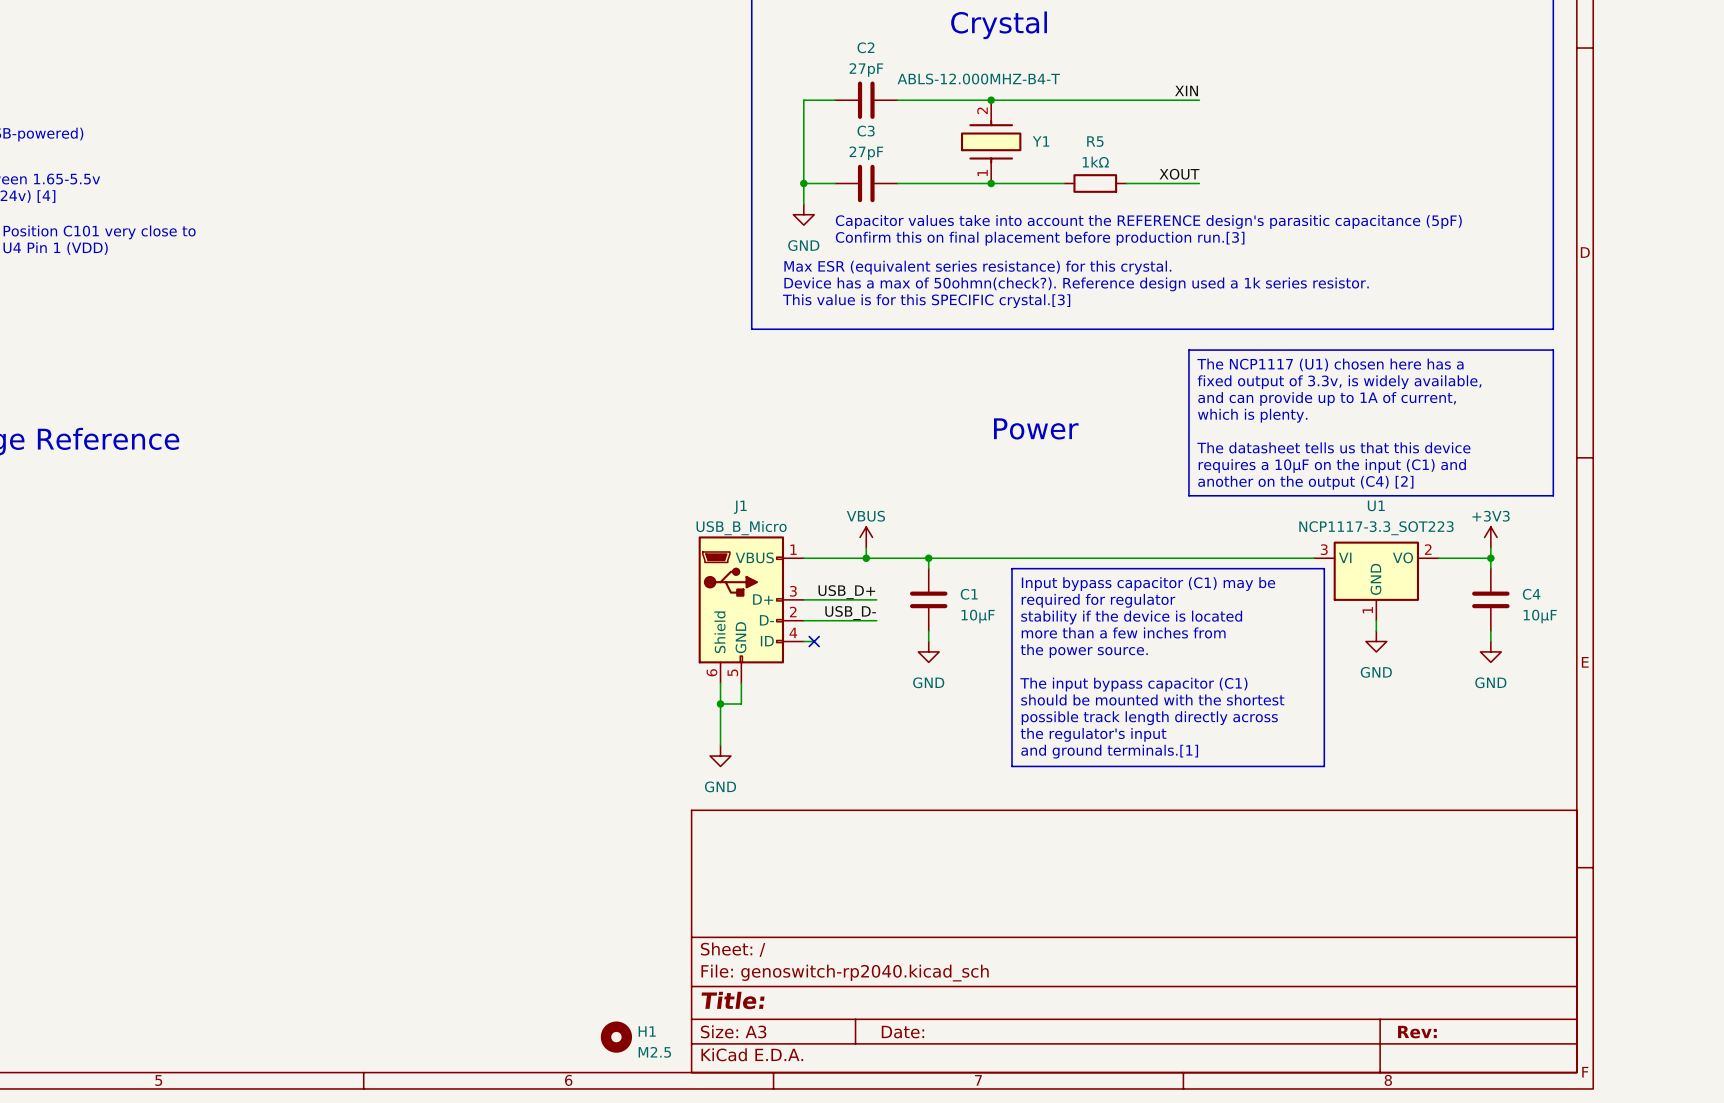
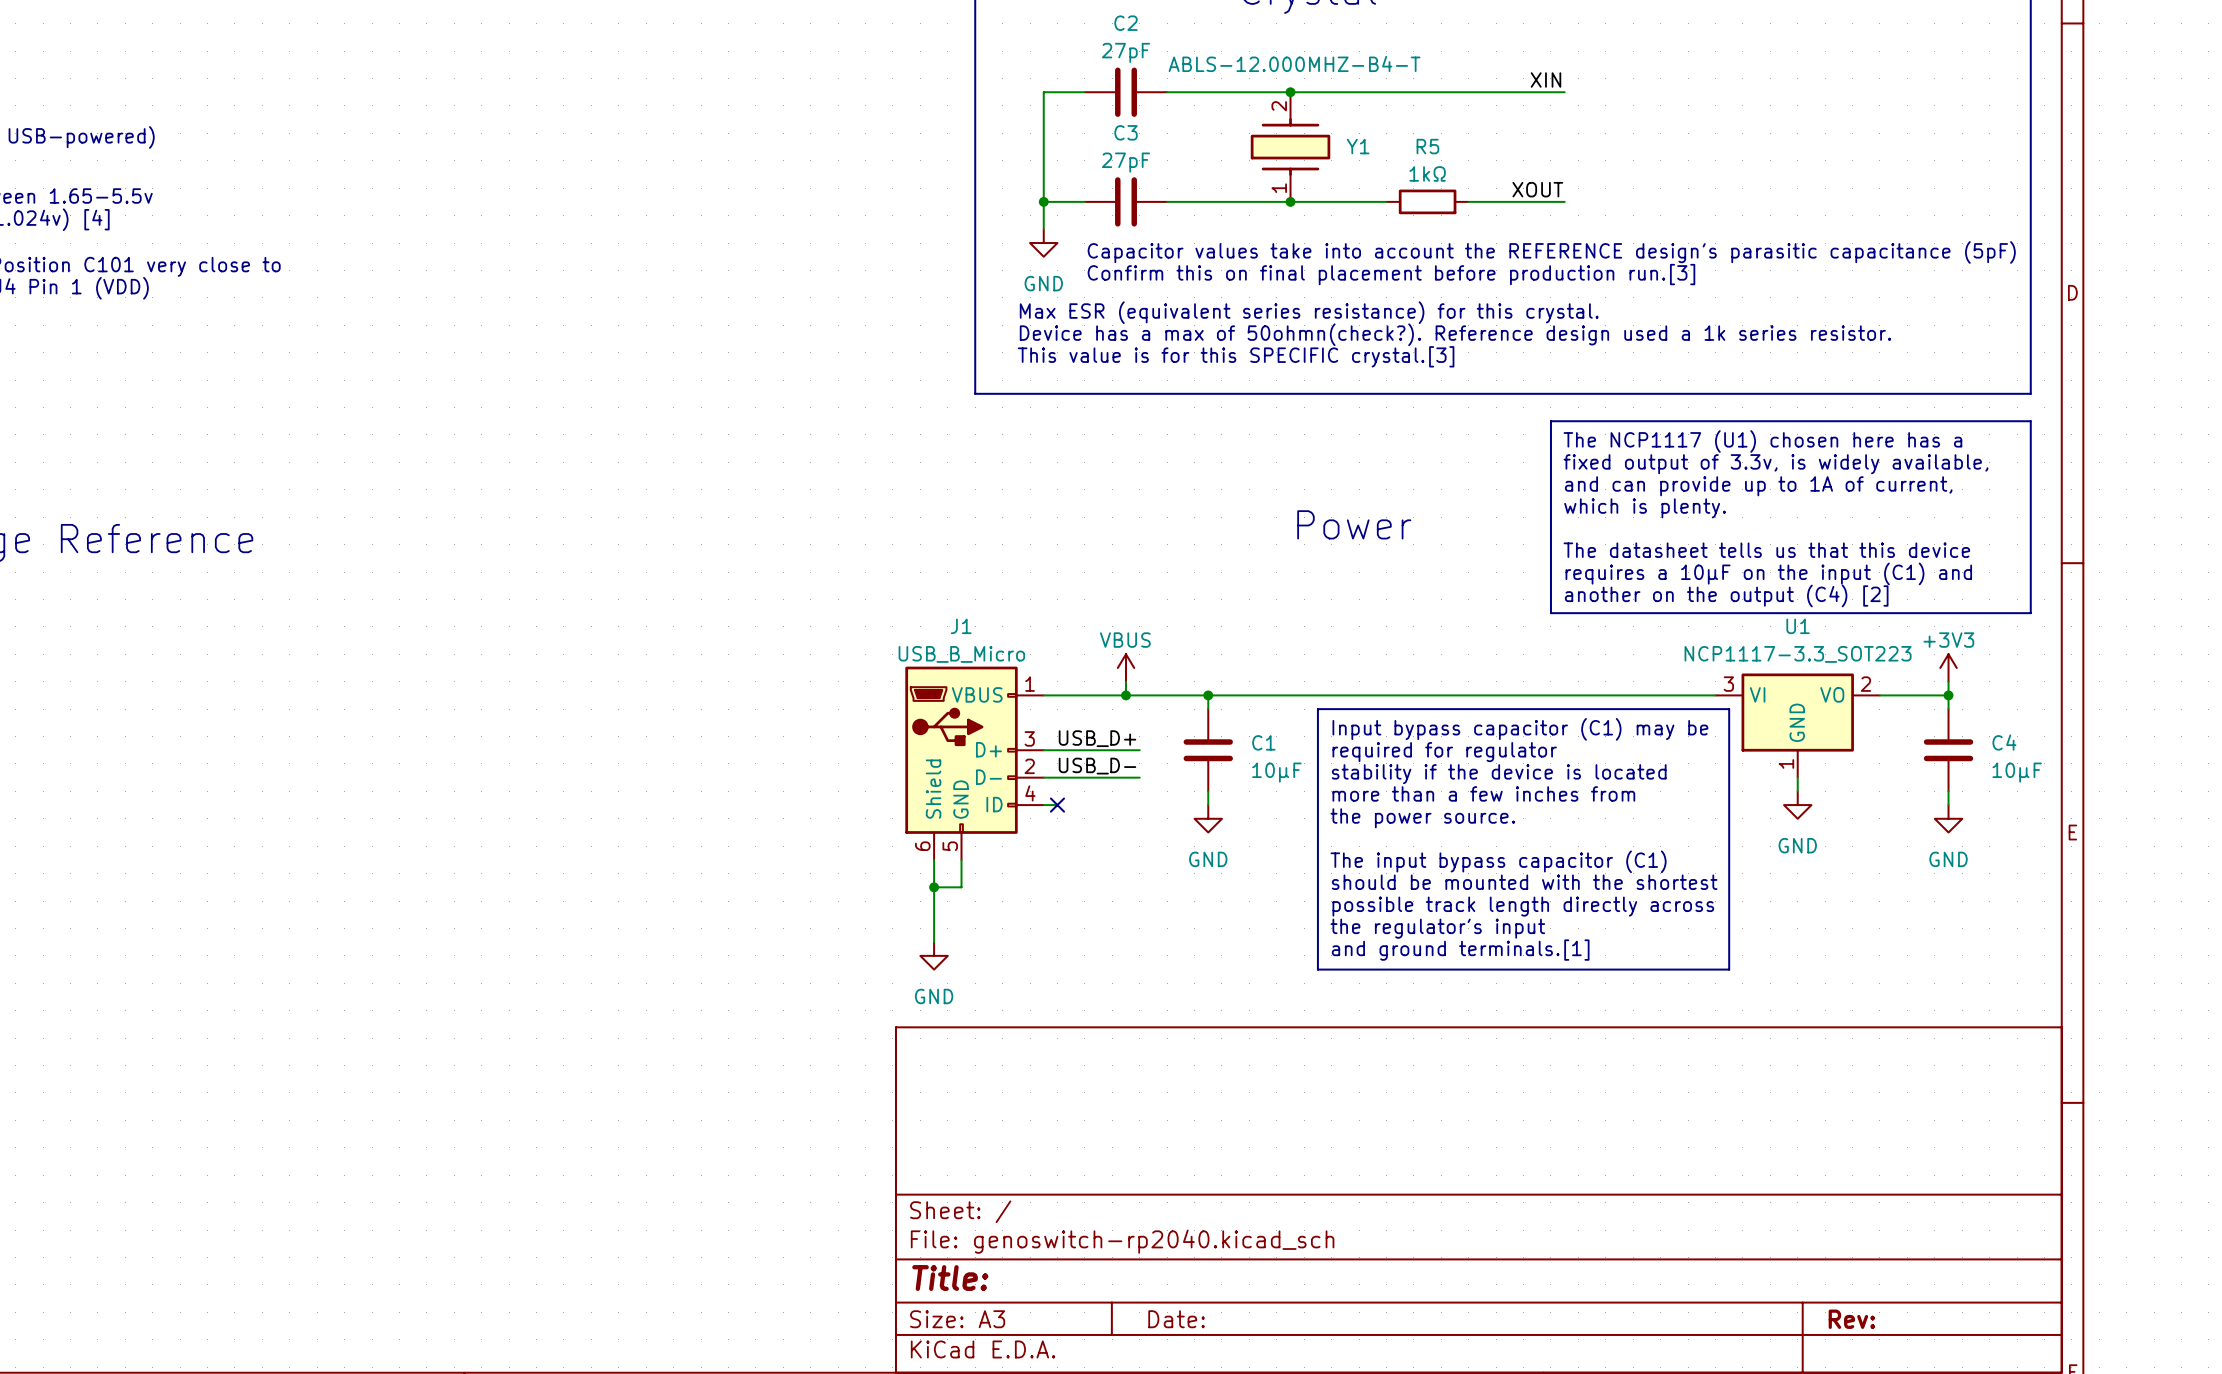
H1: M2.5 (616, 1037) -> none

